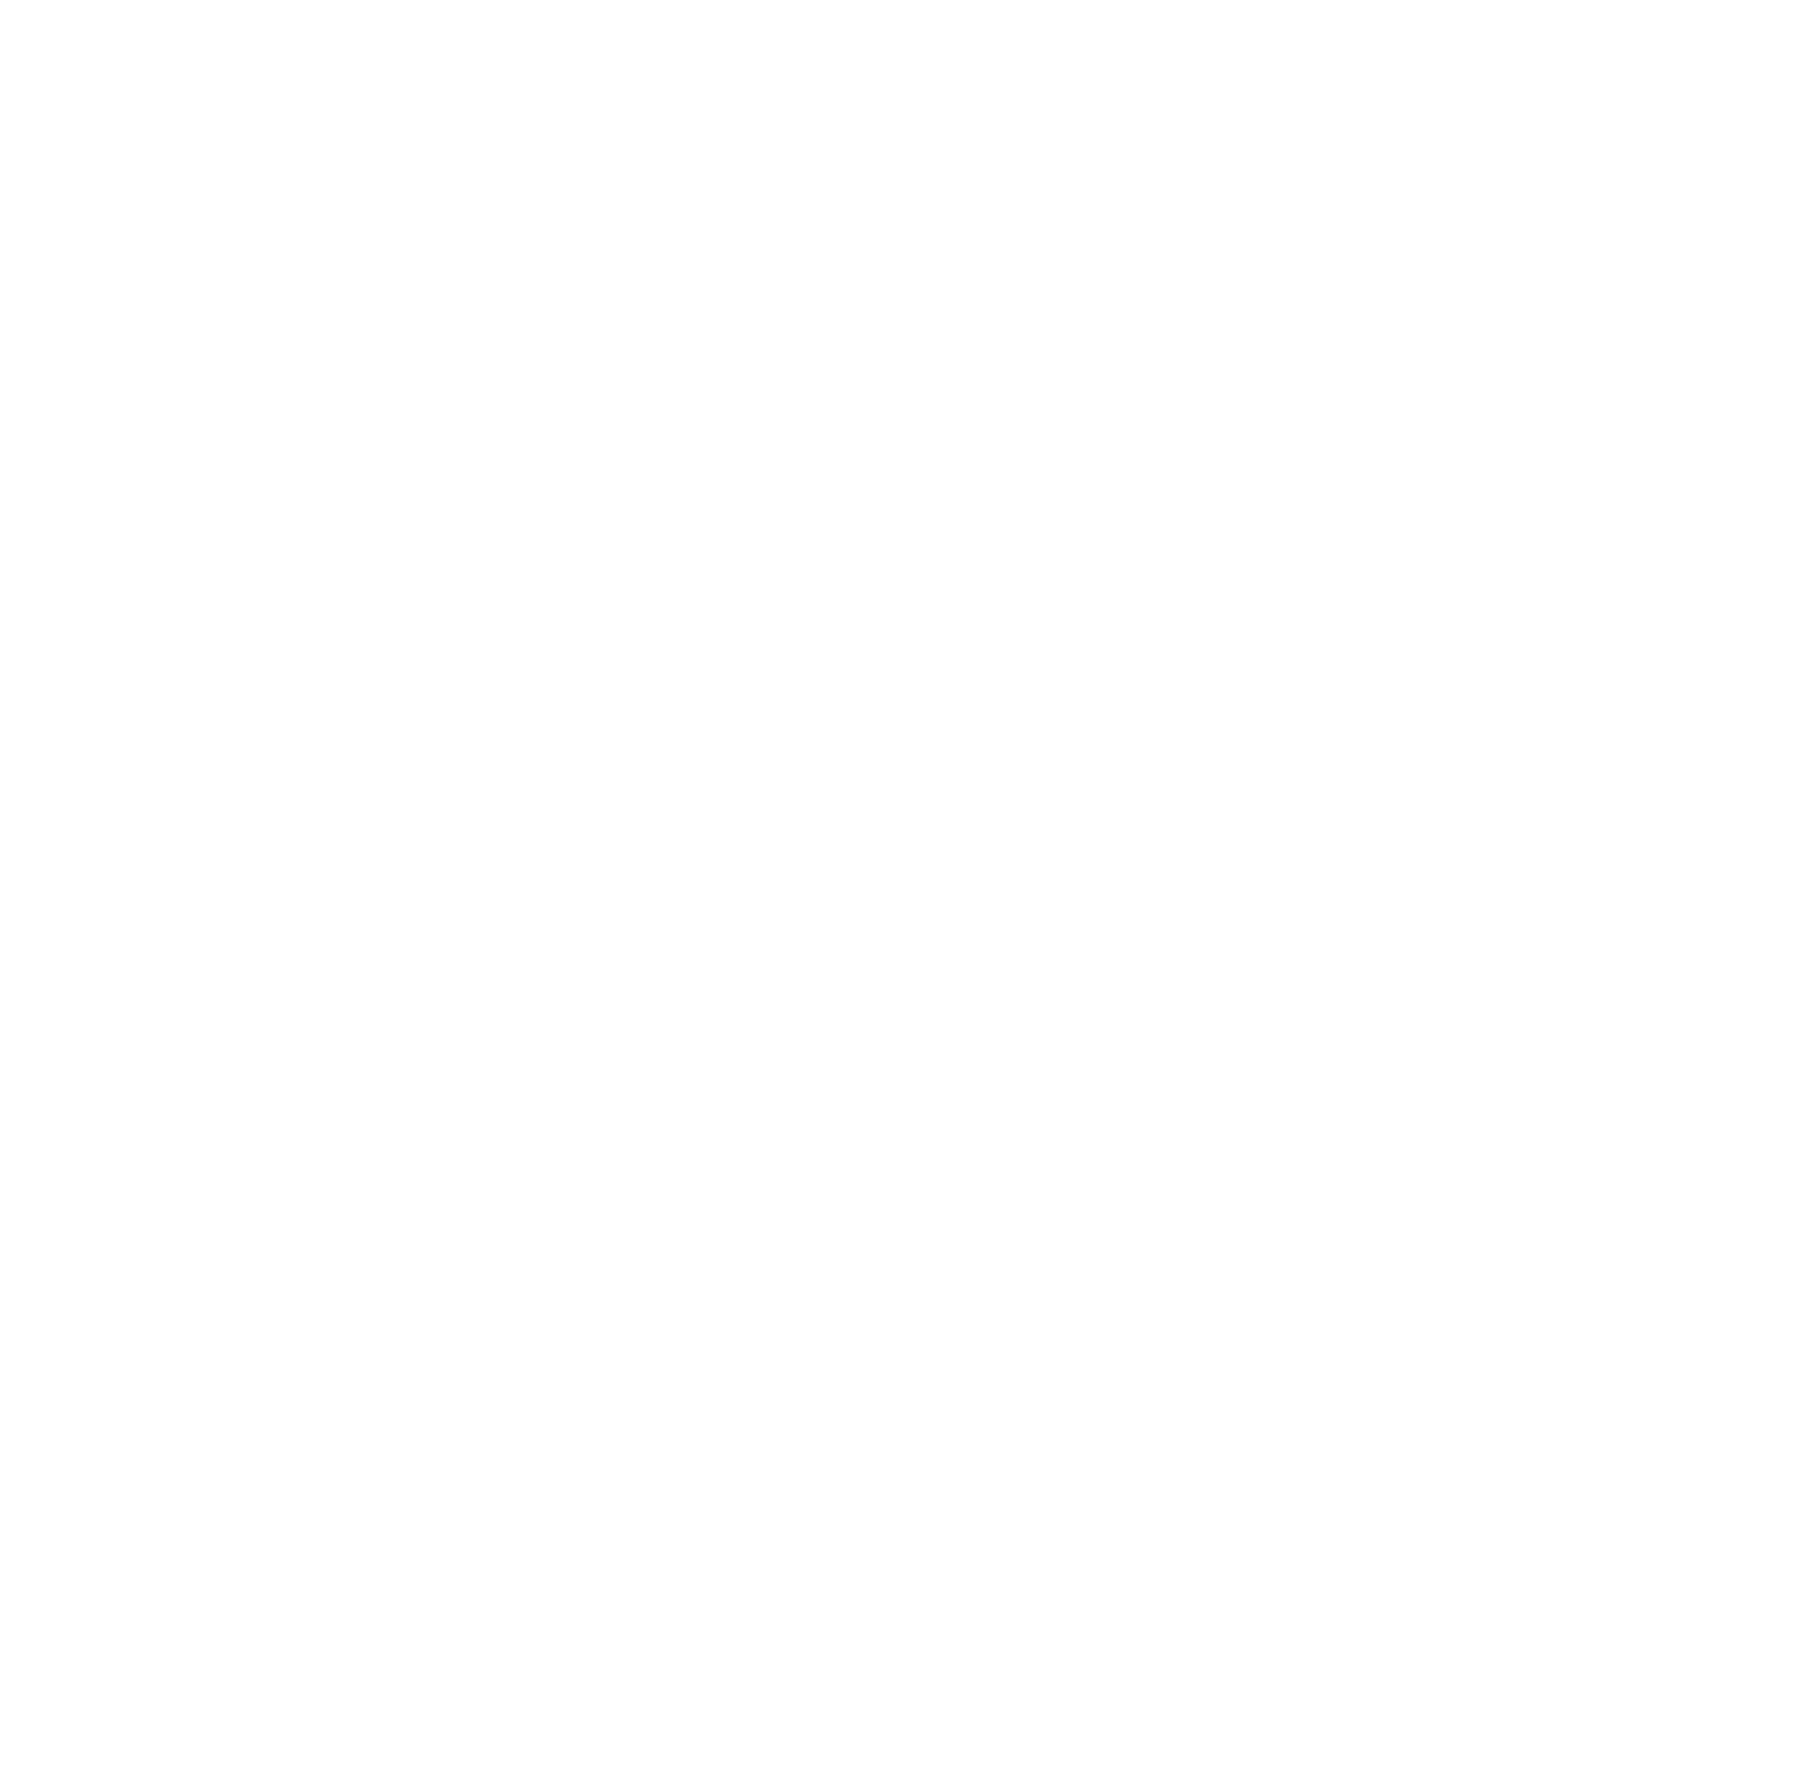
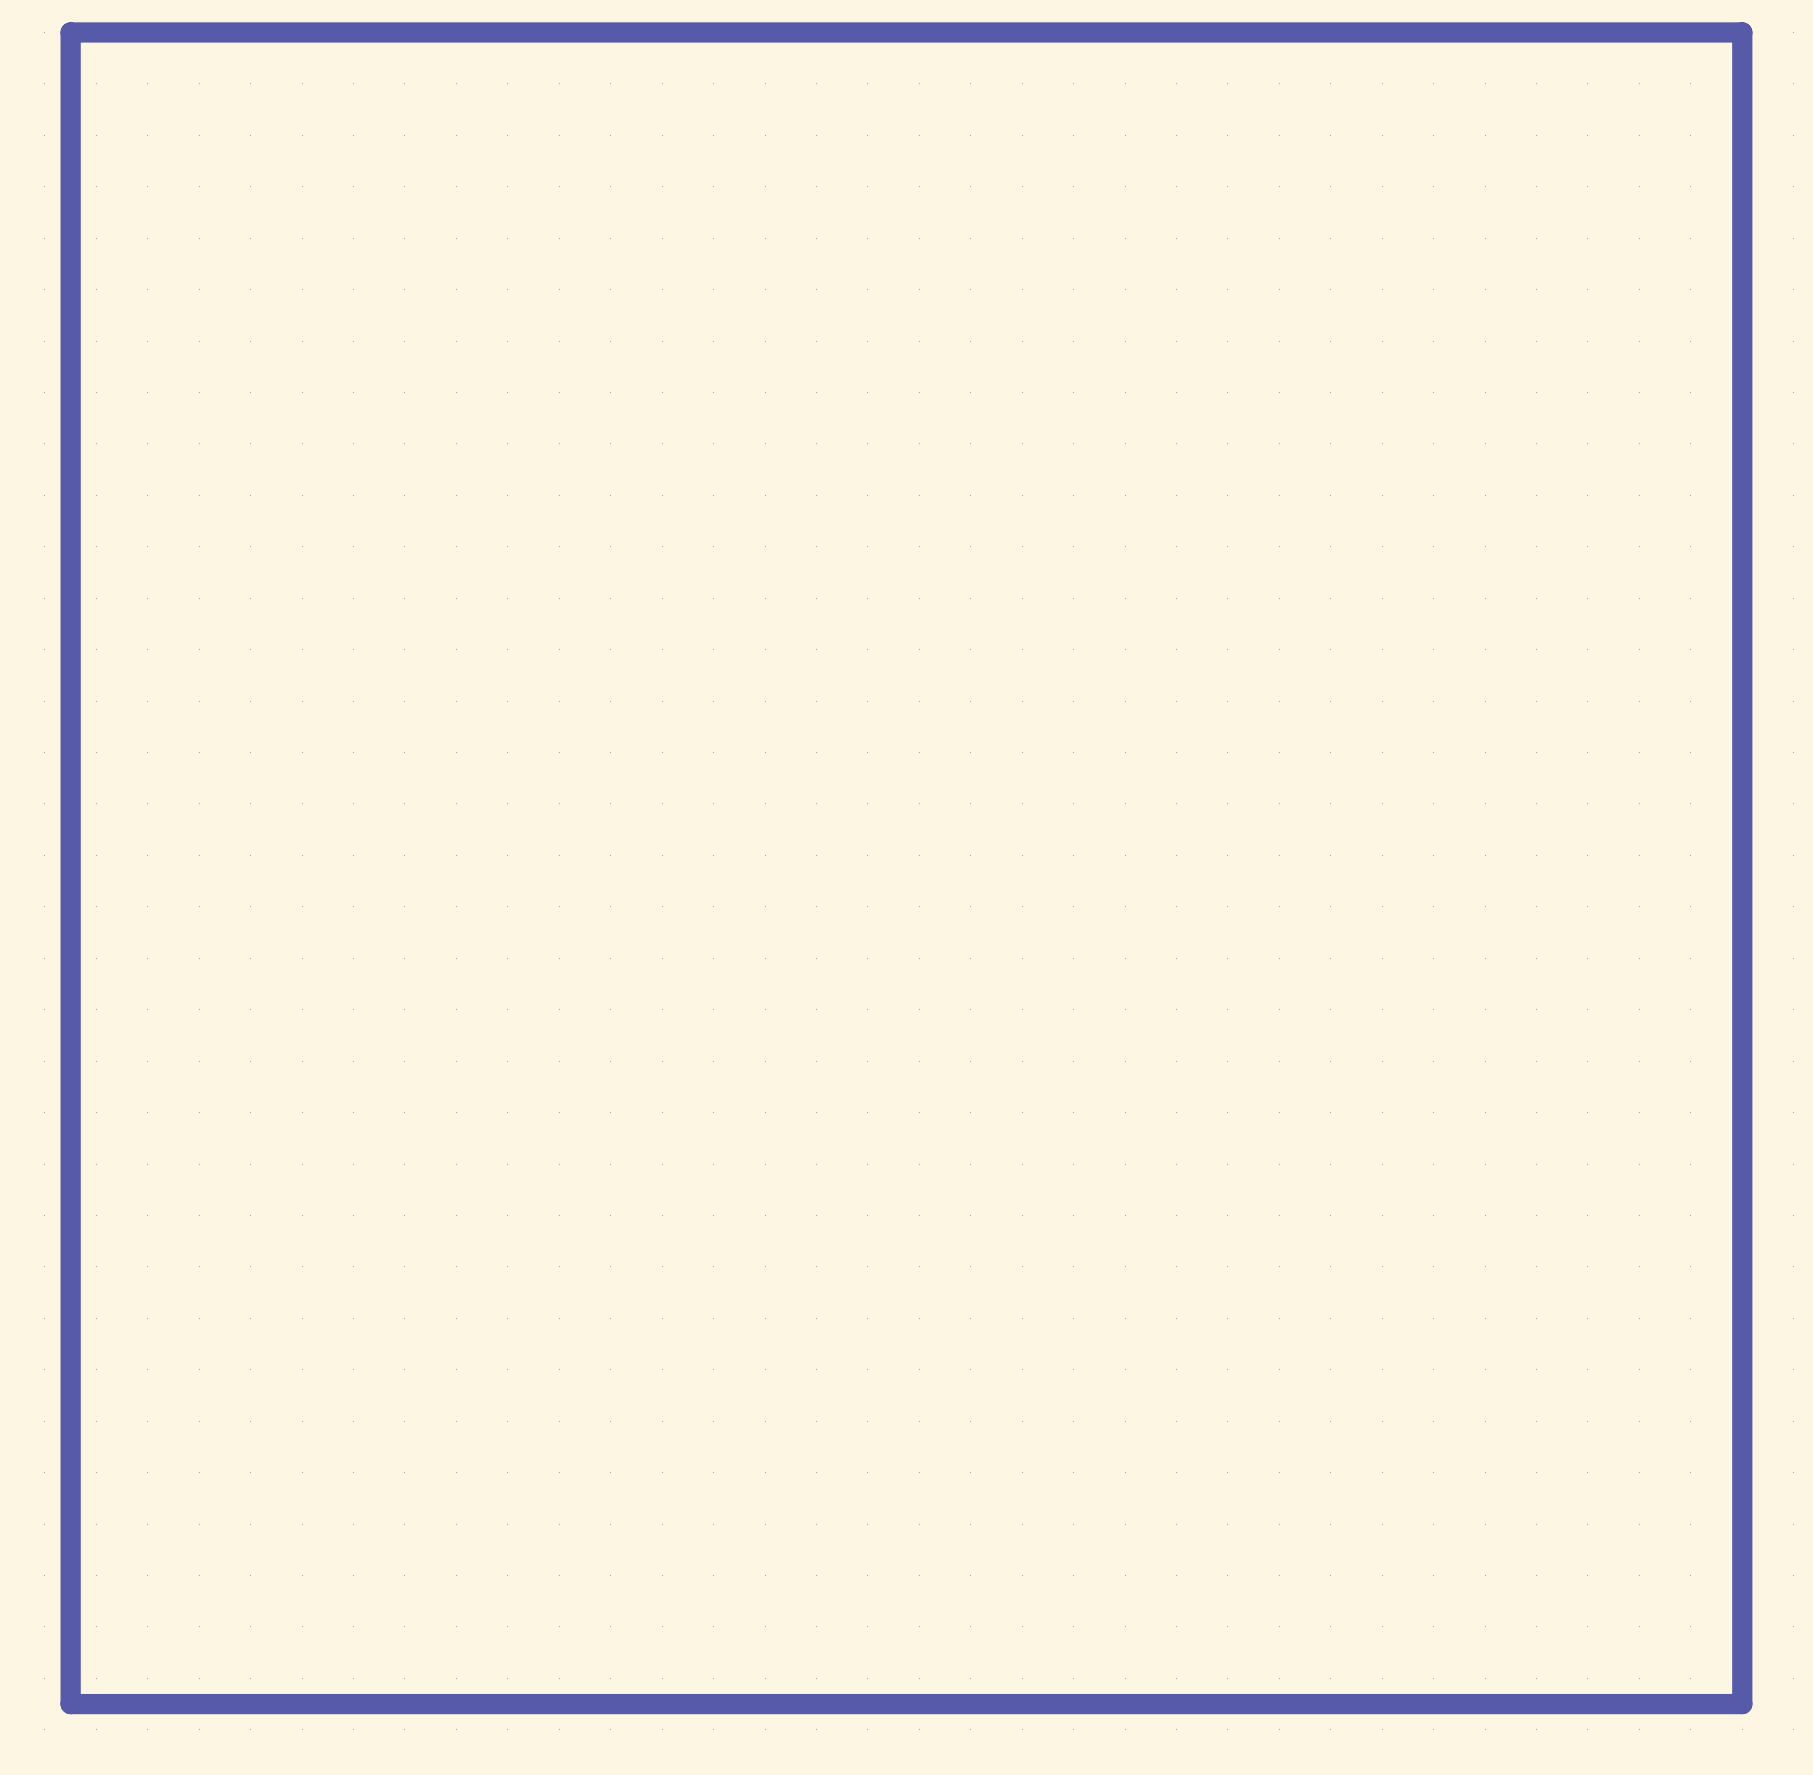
line: none -> (70, 32) (70, 1704) (1742, 1704) (1742, 32) (70, 32)

